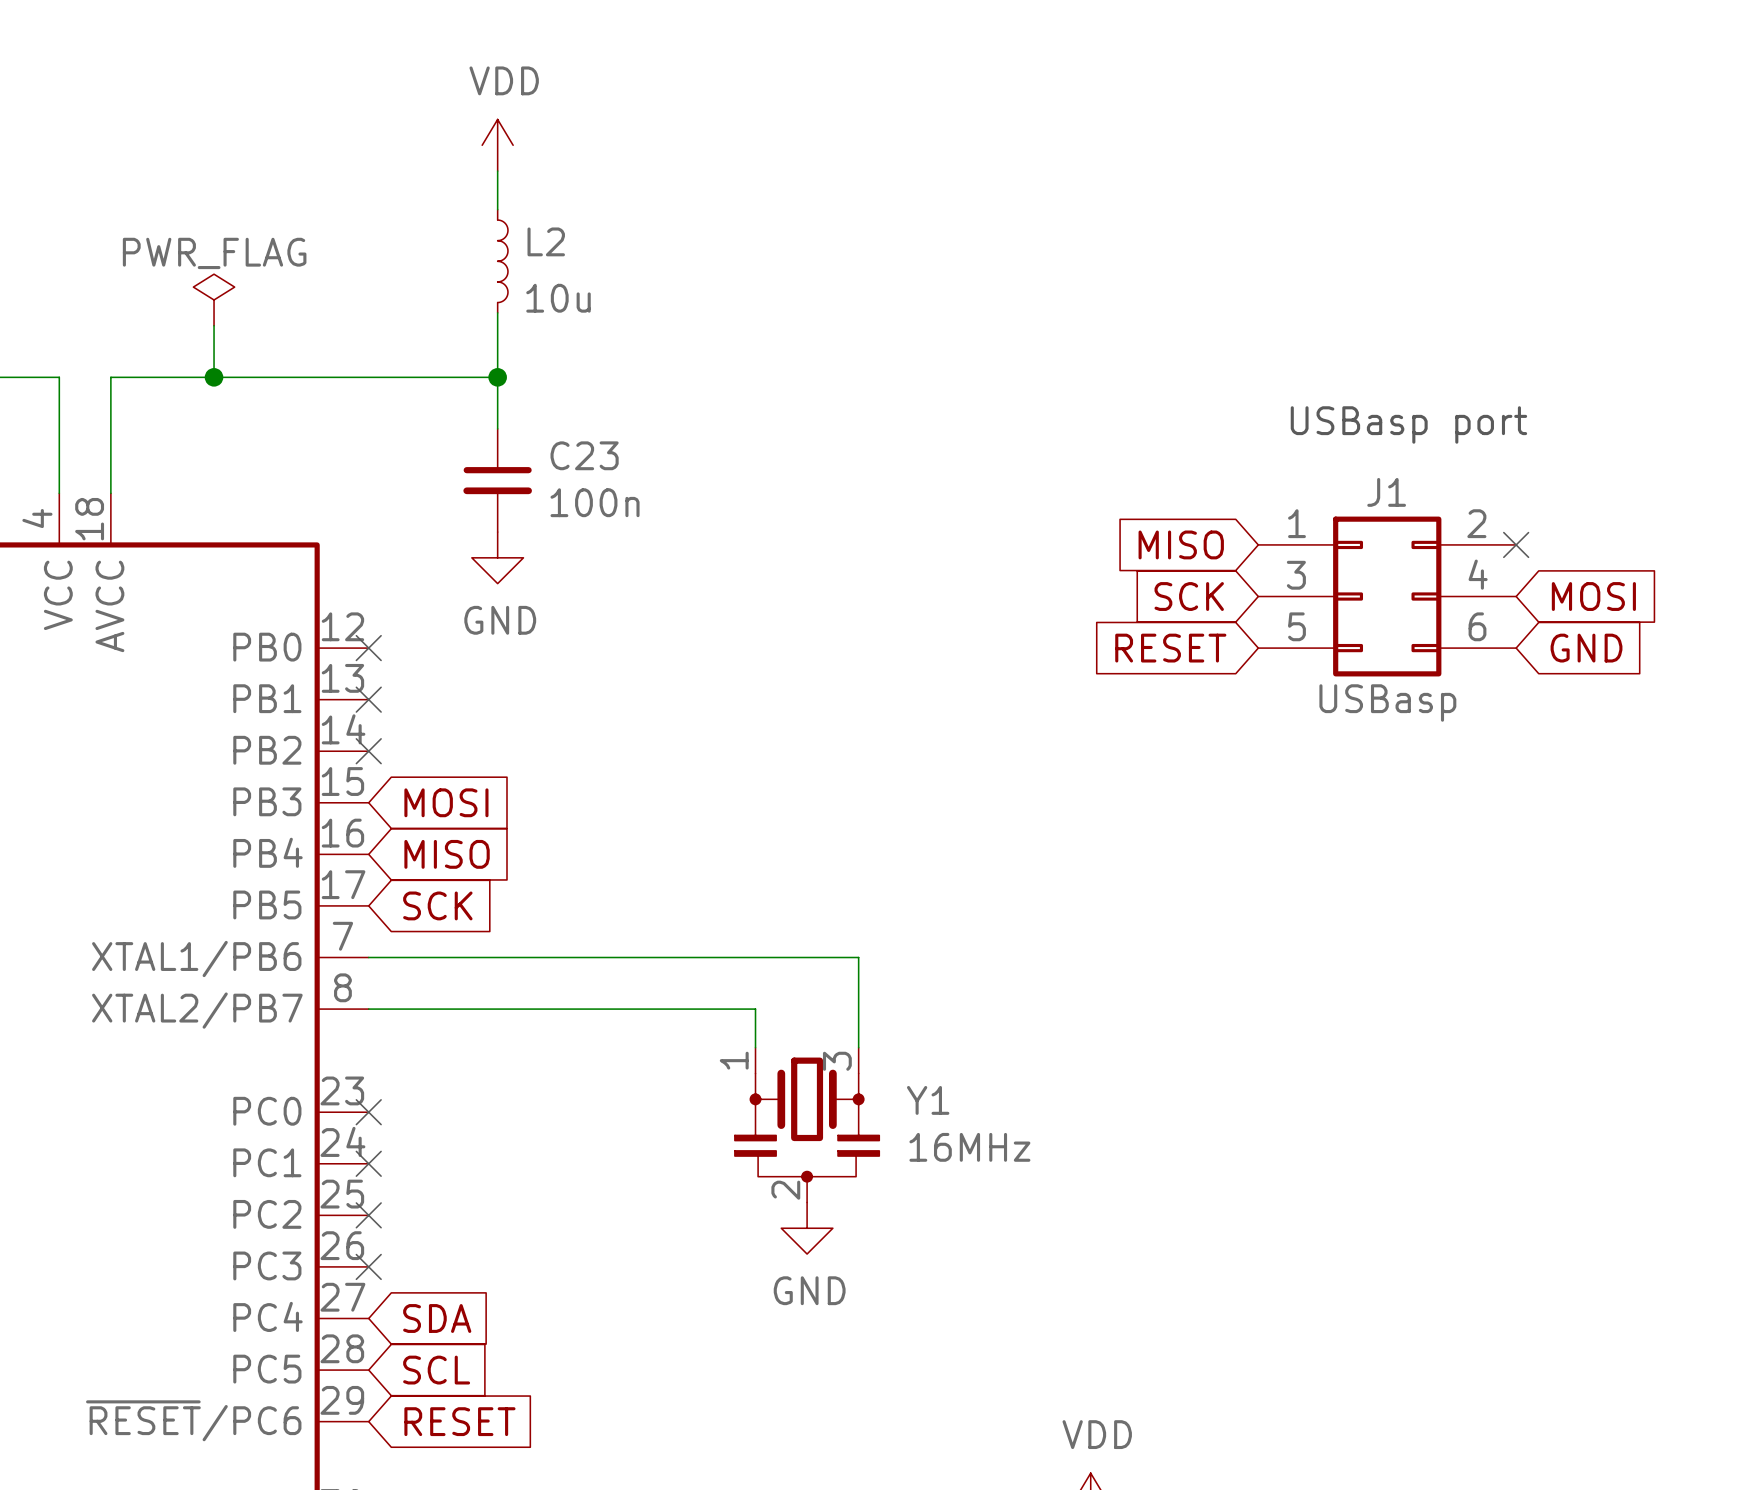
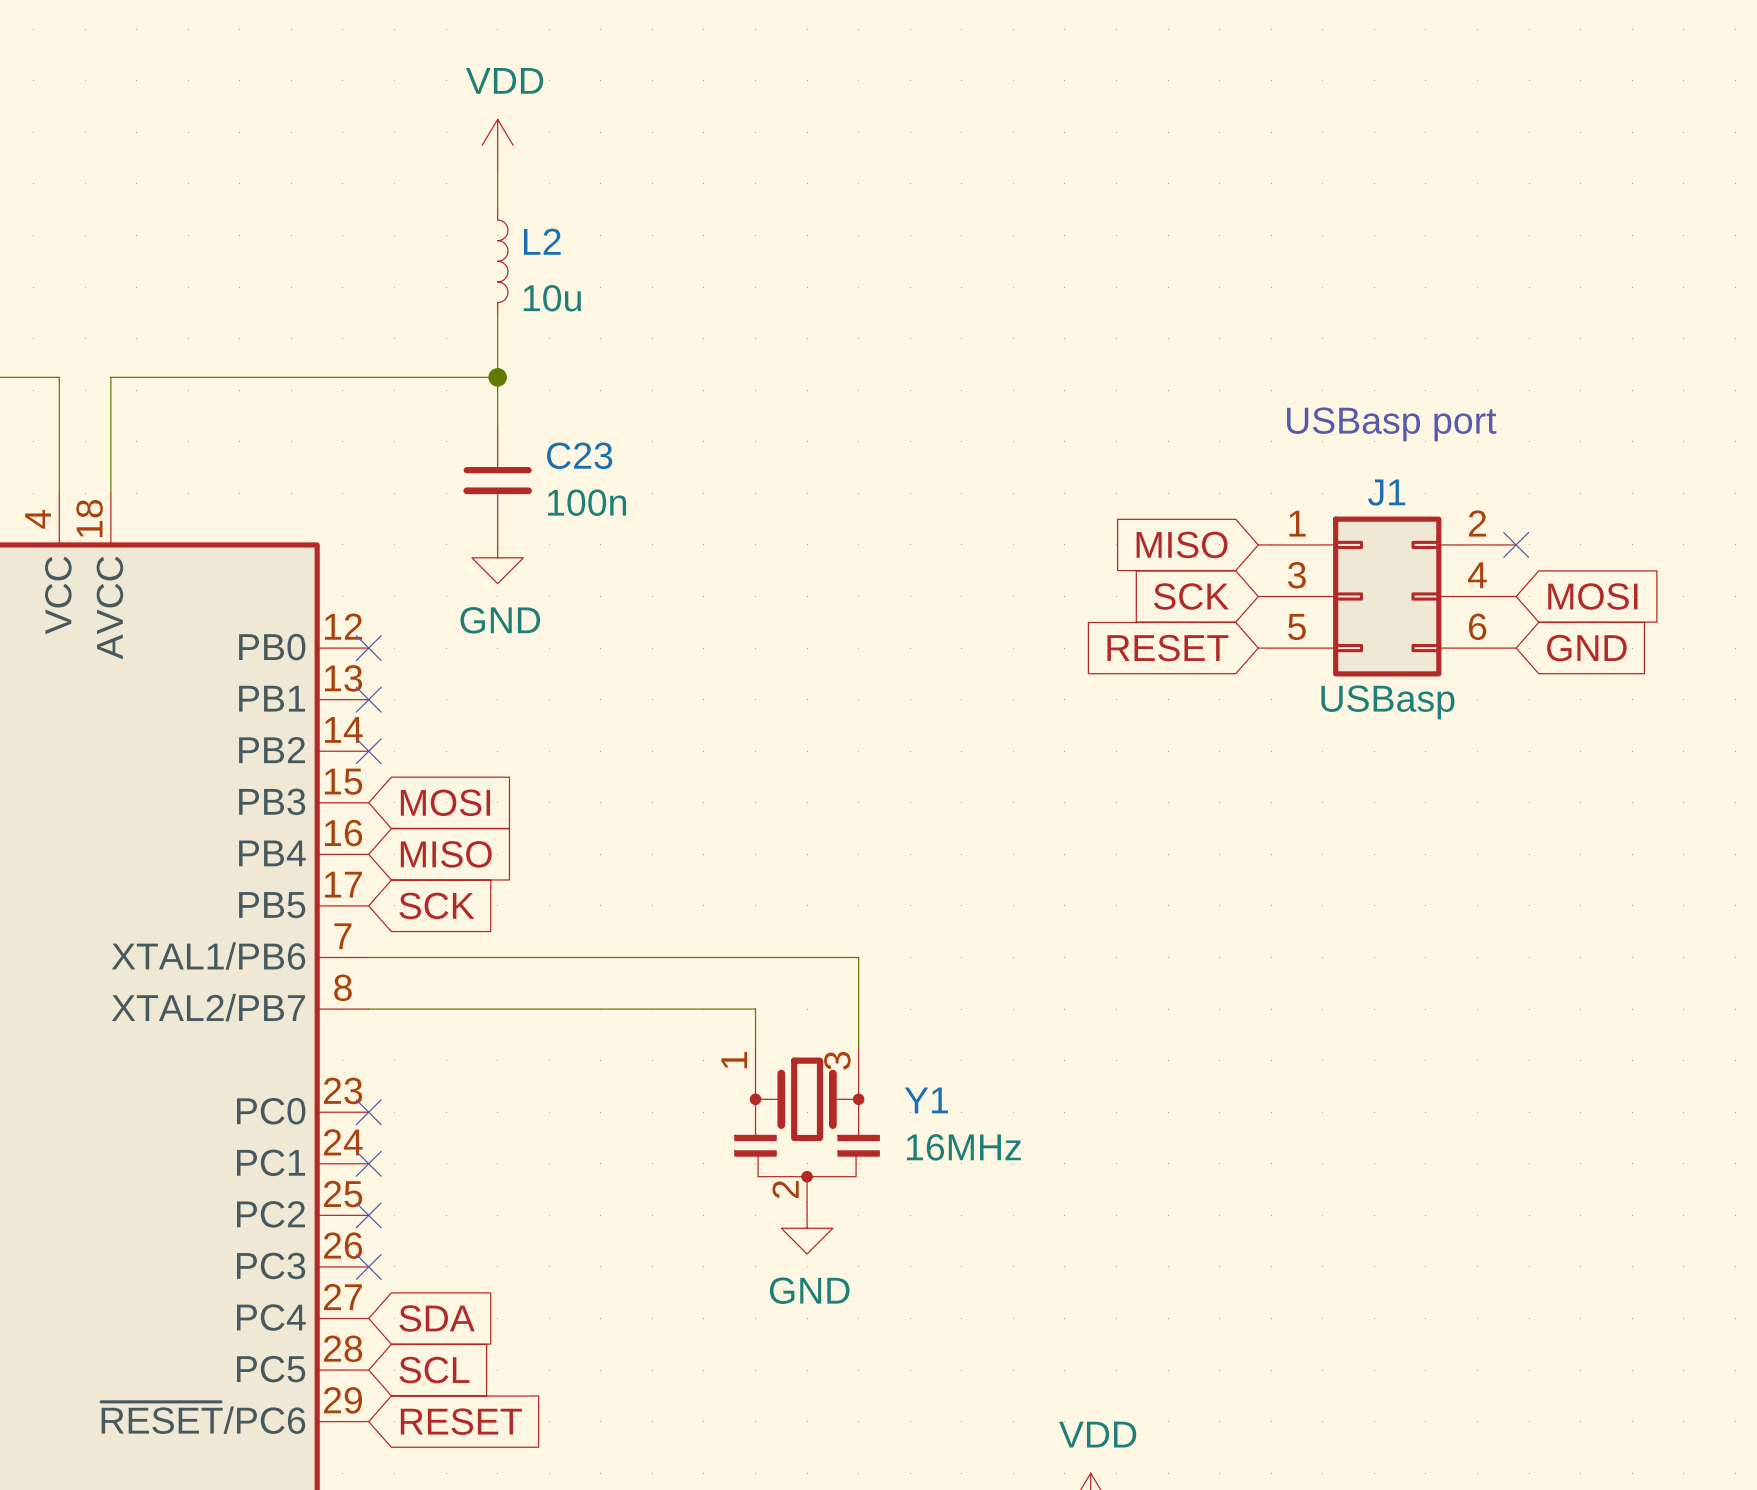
power symbol: PWR_FLAG (214, 299) -> none
wire: (214, 325) (214, 377) -> none
junction: (214, 377) -> none

